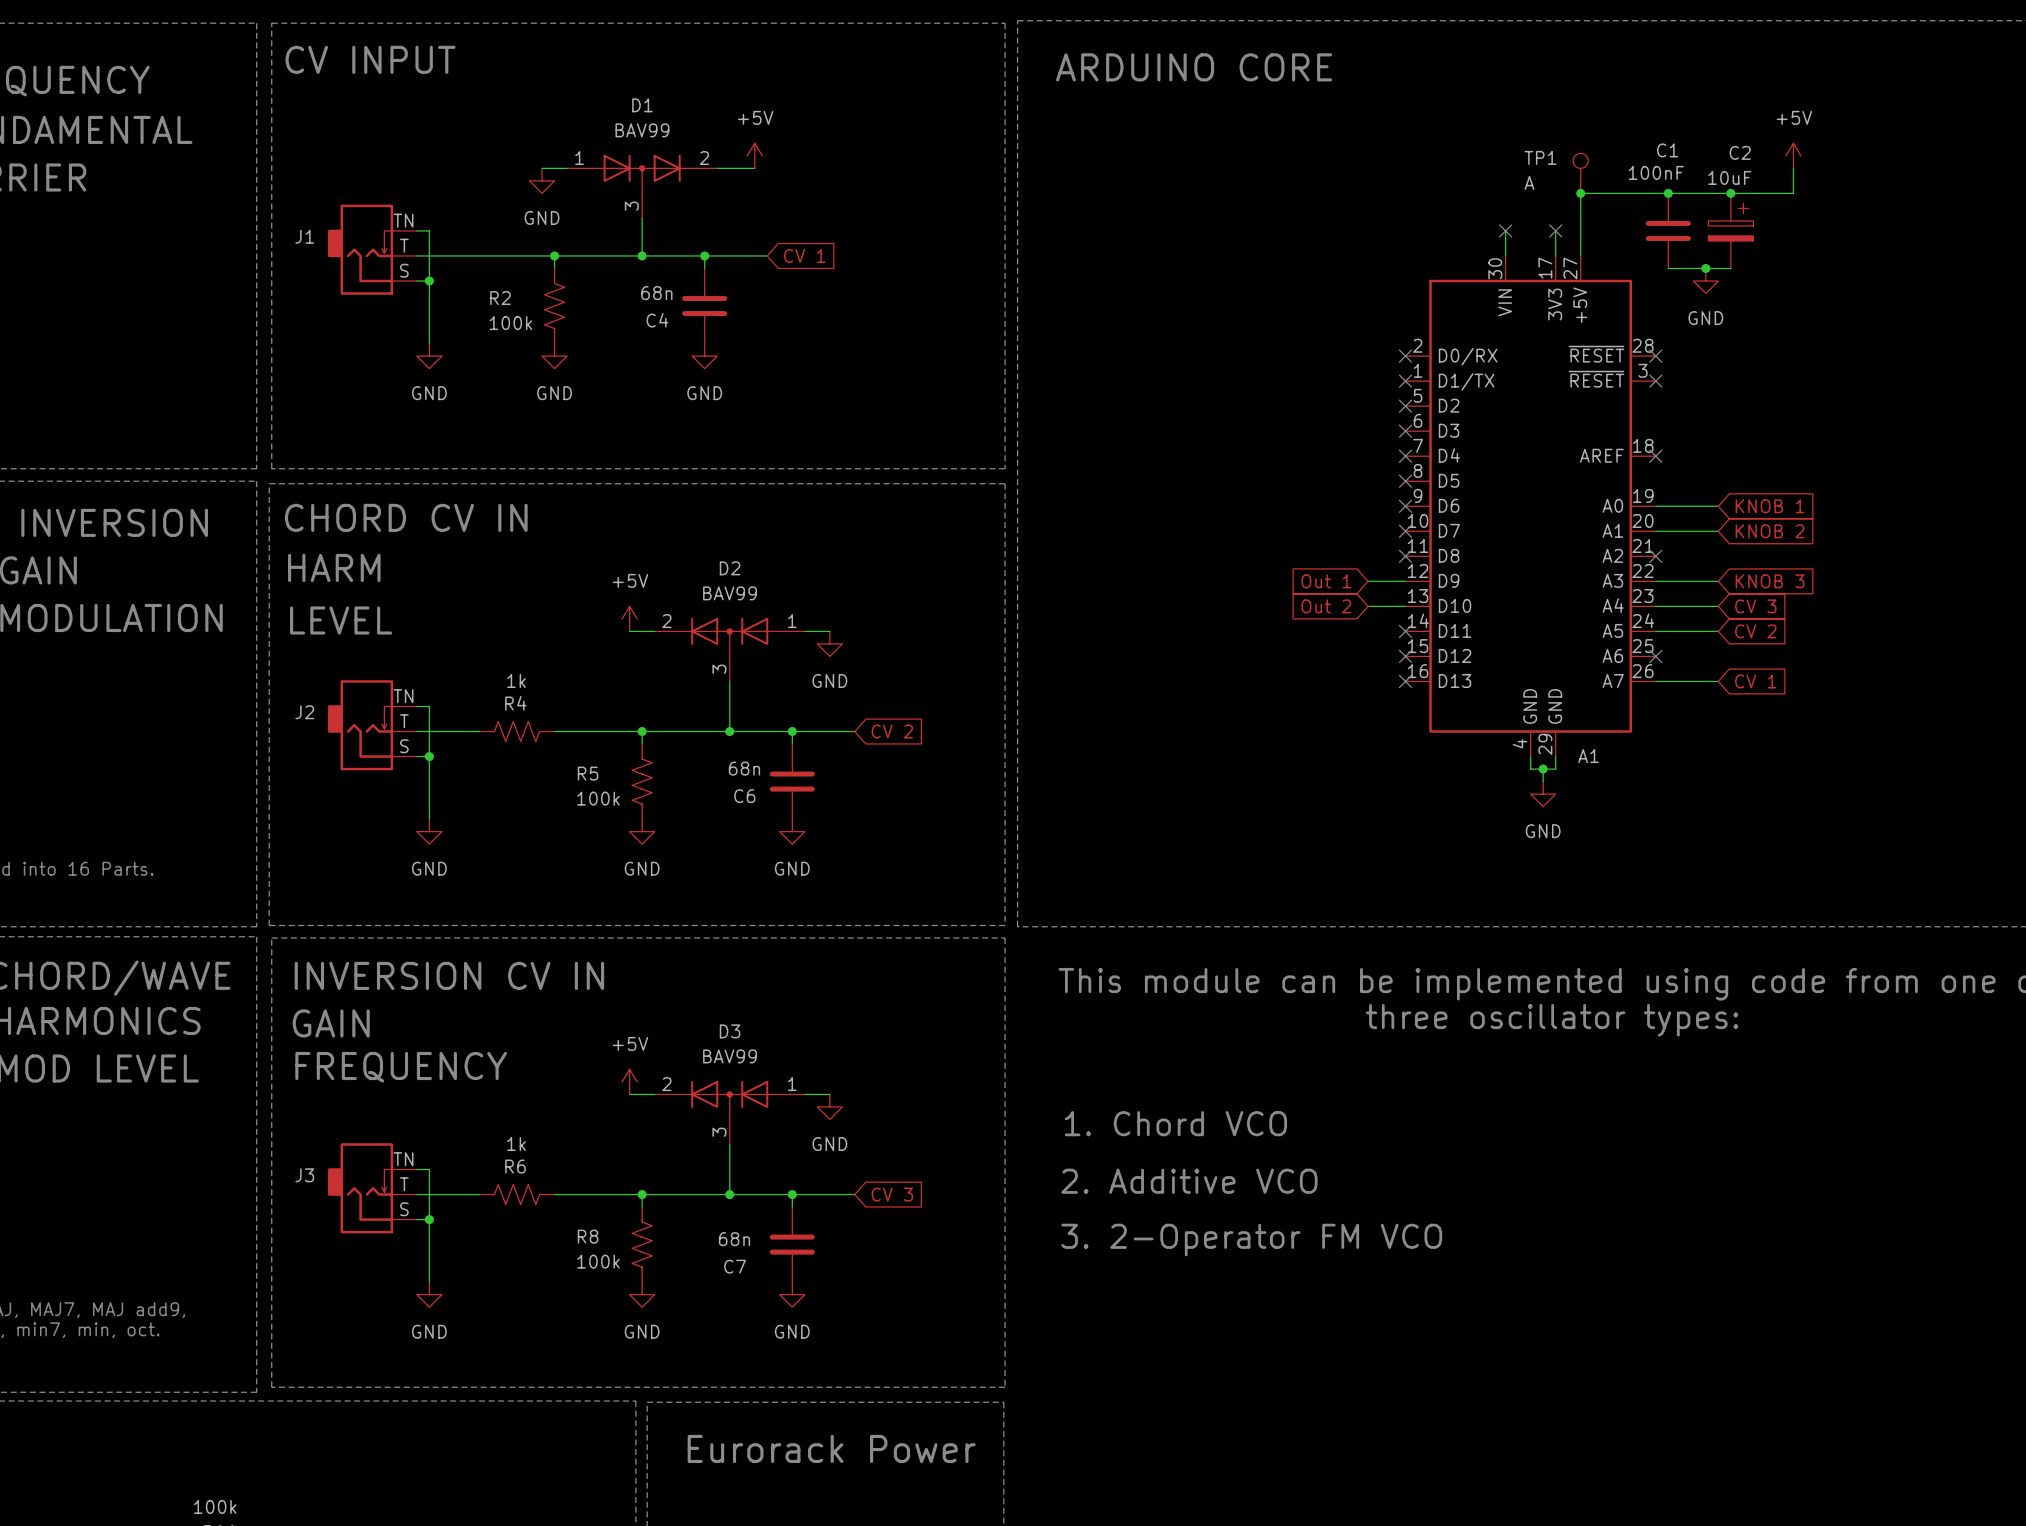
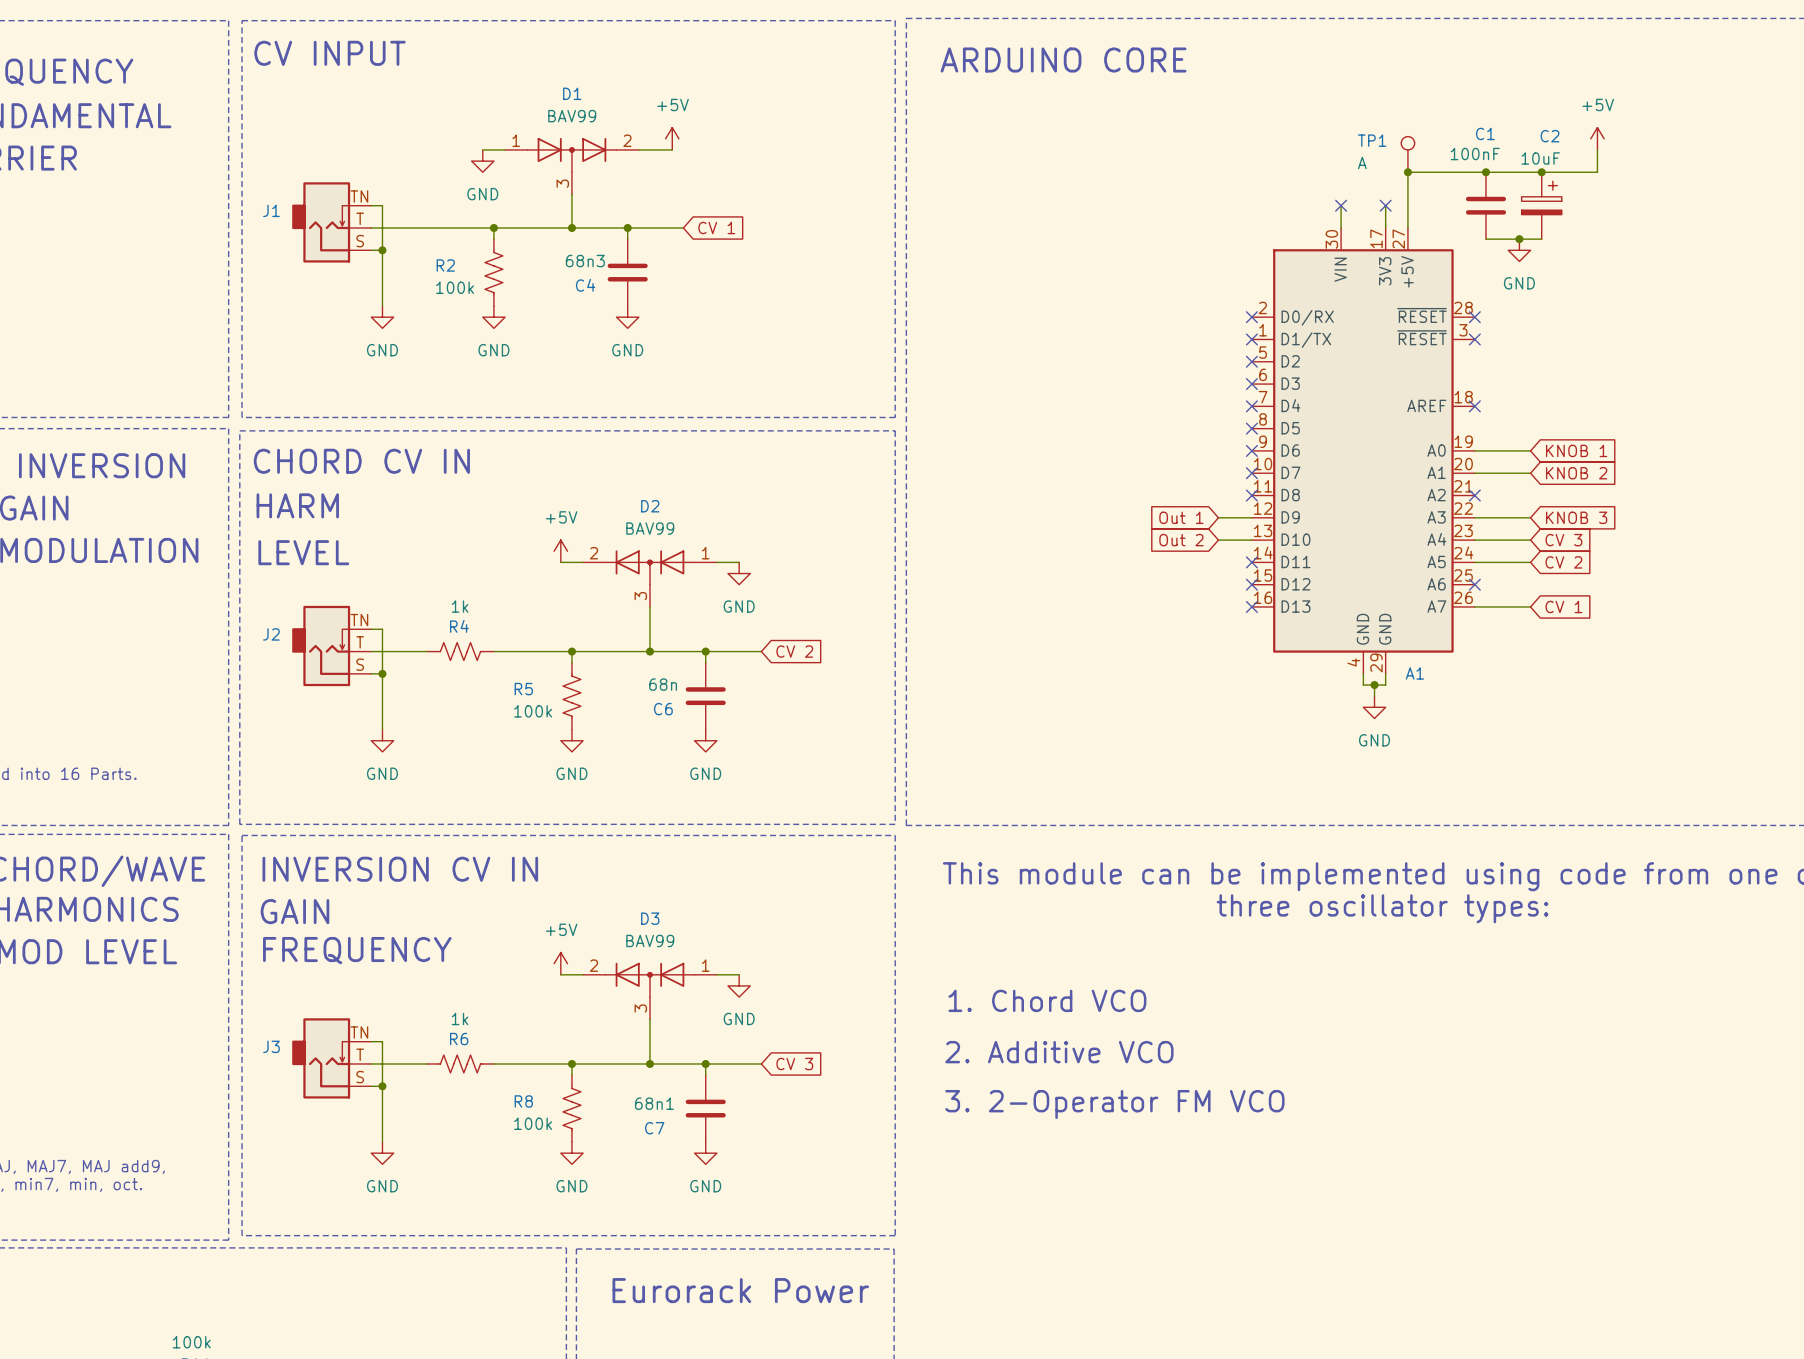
C4 value: 68n (656, 293) -> 68n3 (585, 261)
C7 value: 68n (734, 1239) -> 68n1 (654, 1103)

